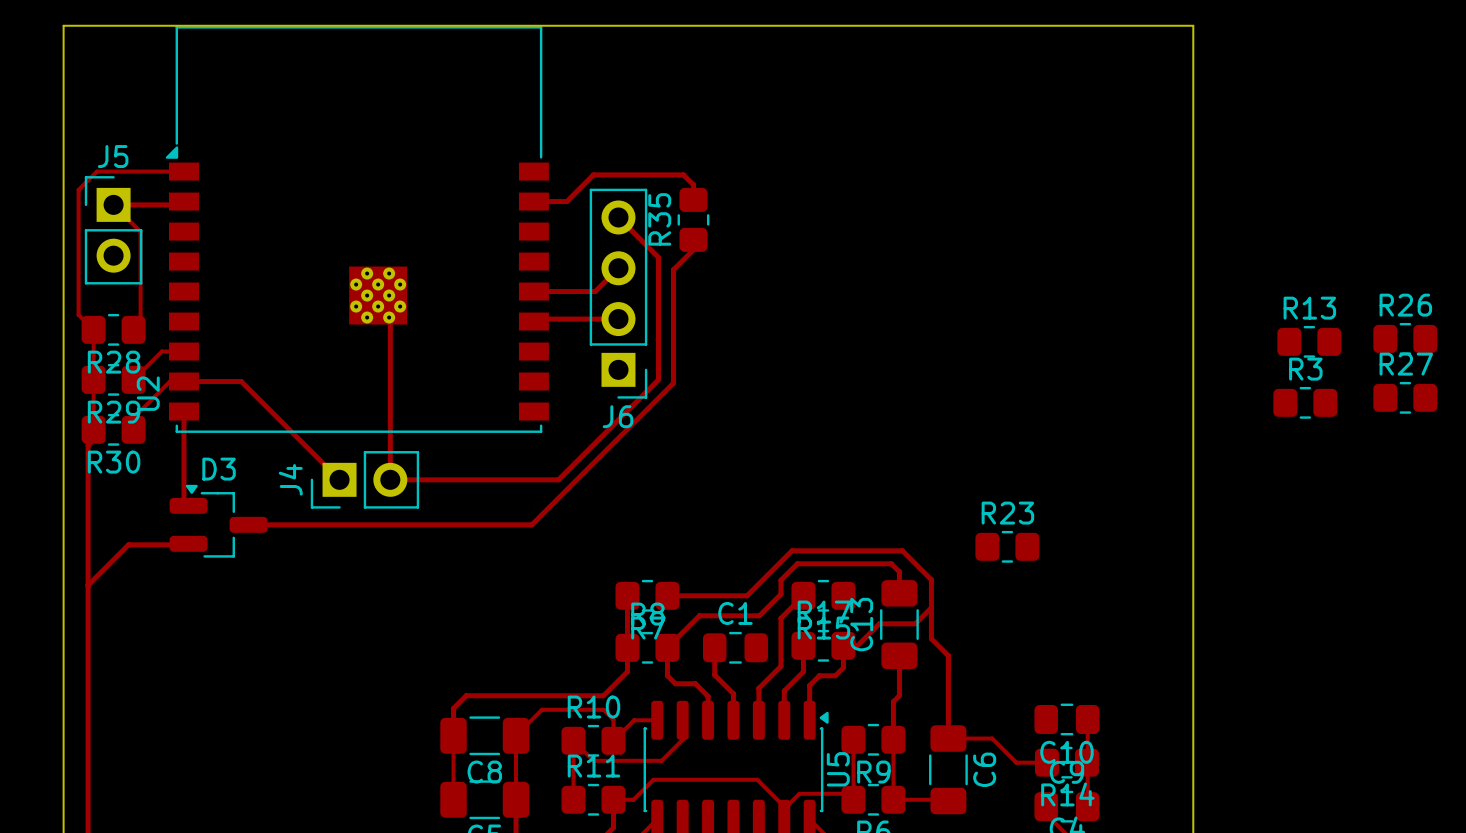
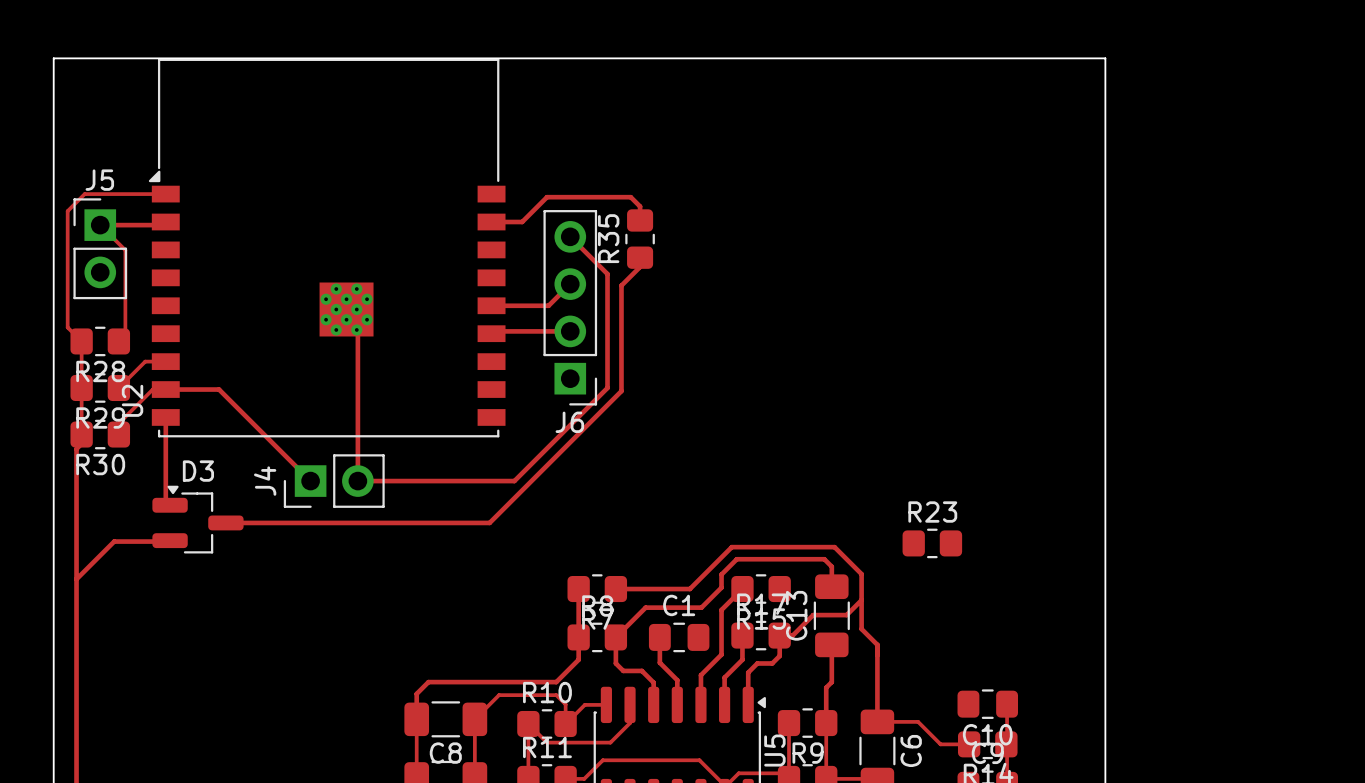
R26: (1405, 338) -> none
R13: (1309, 341) -> none
R27: (1405, 397) -> none
R3: (1305, 402) -> none

